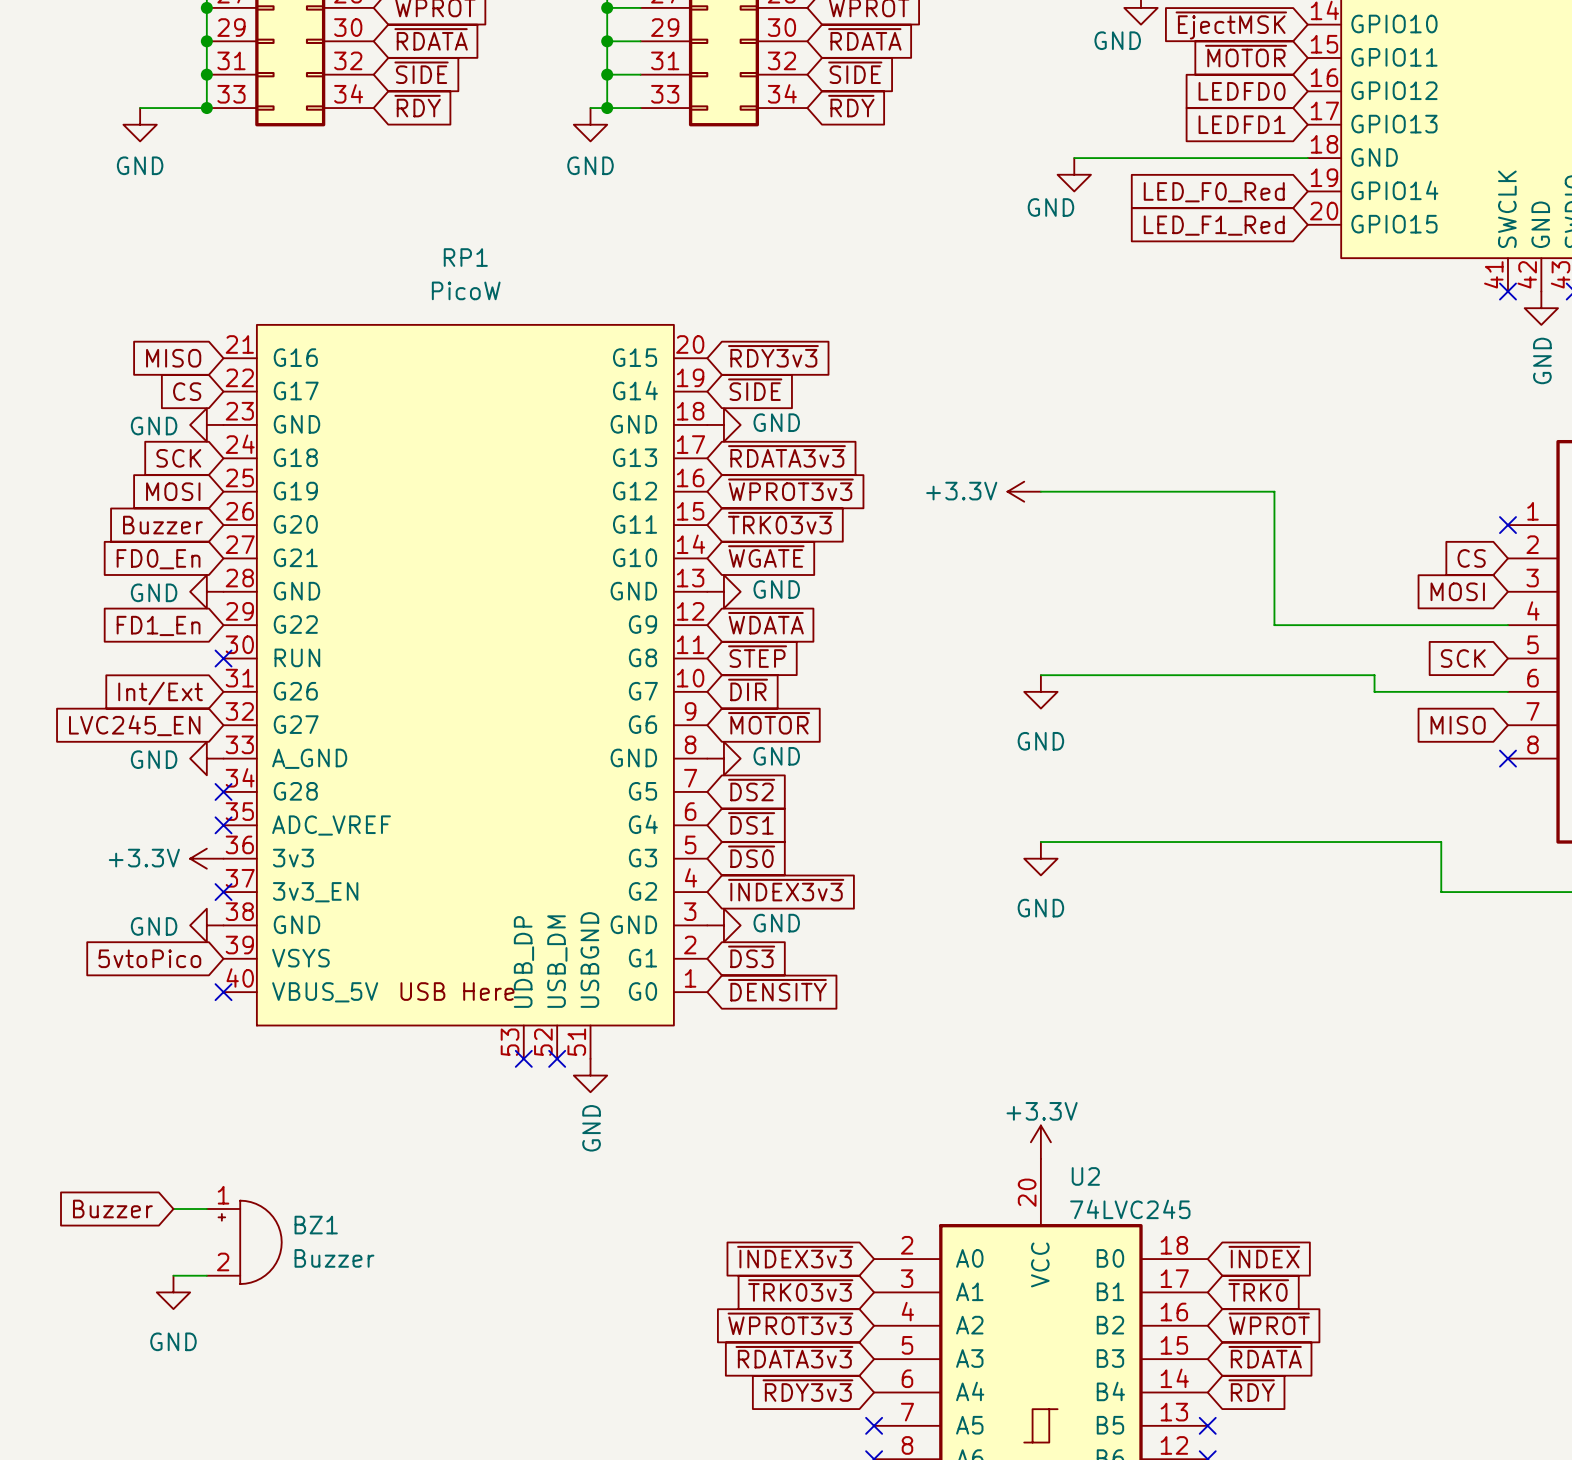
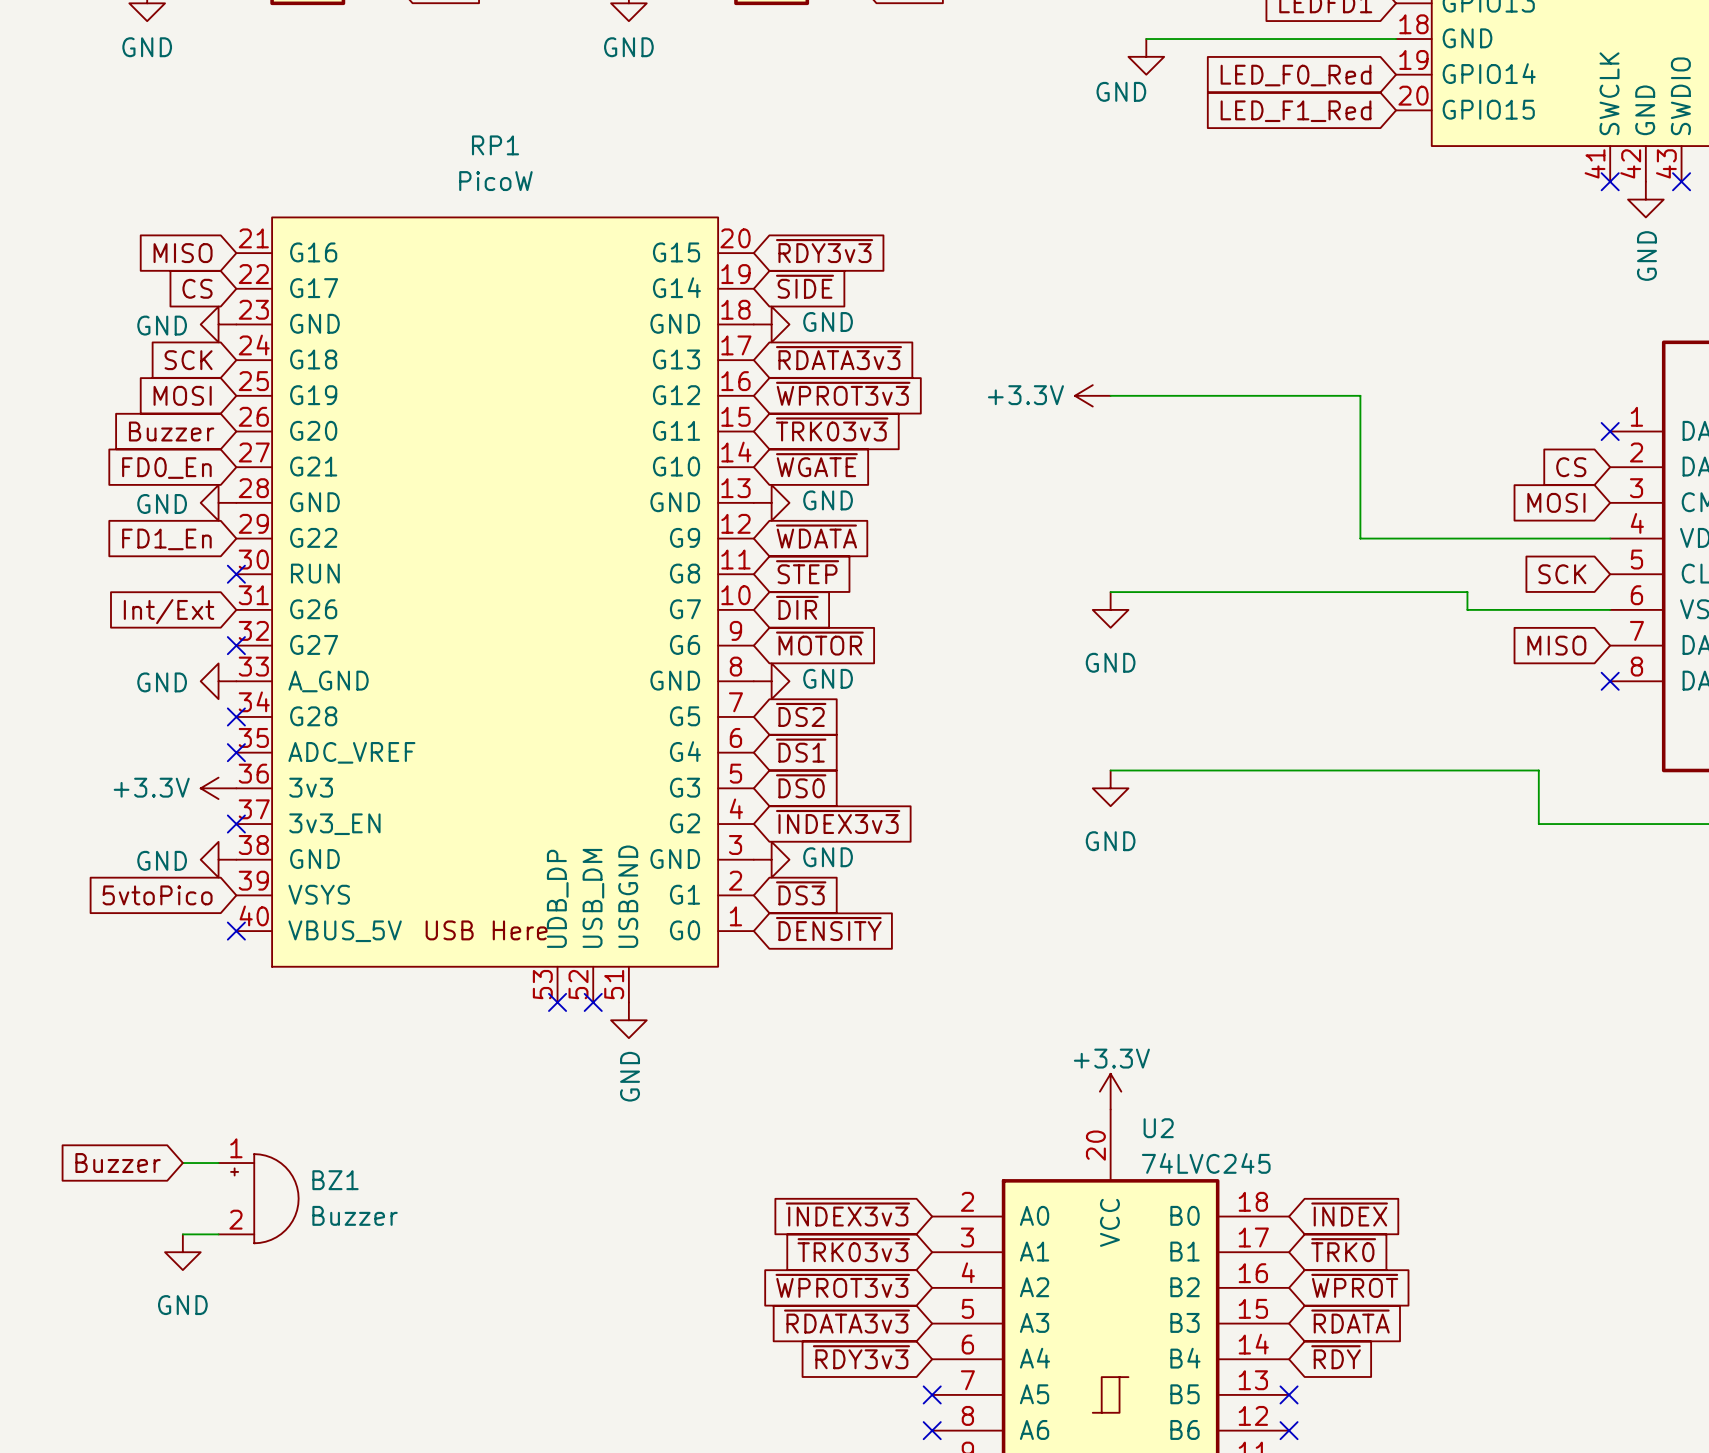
global label: LVC245_EN (134, 725) -> none
no-connect mark: none -> (236, 645)

